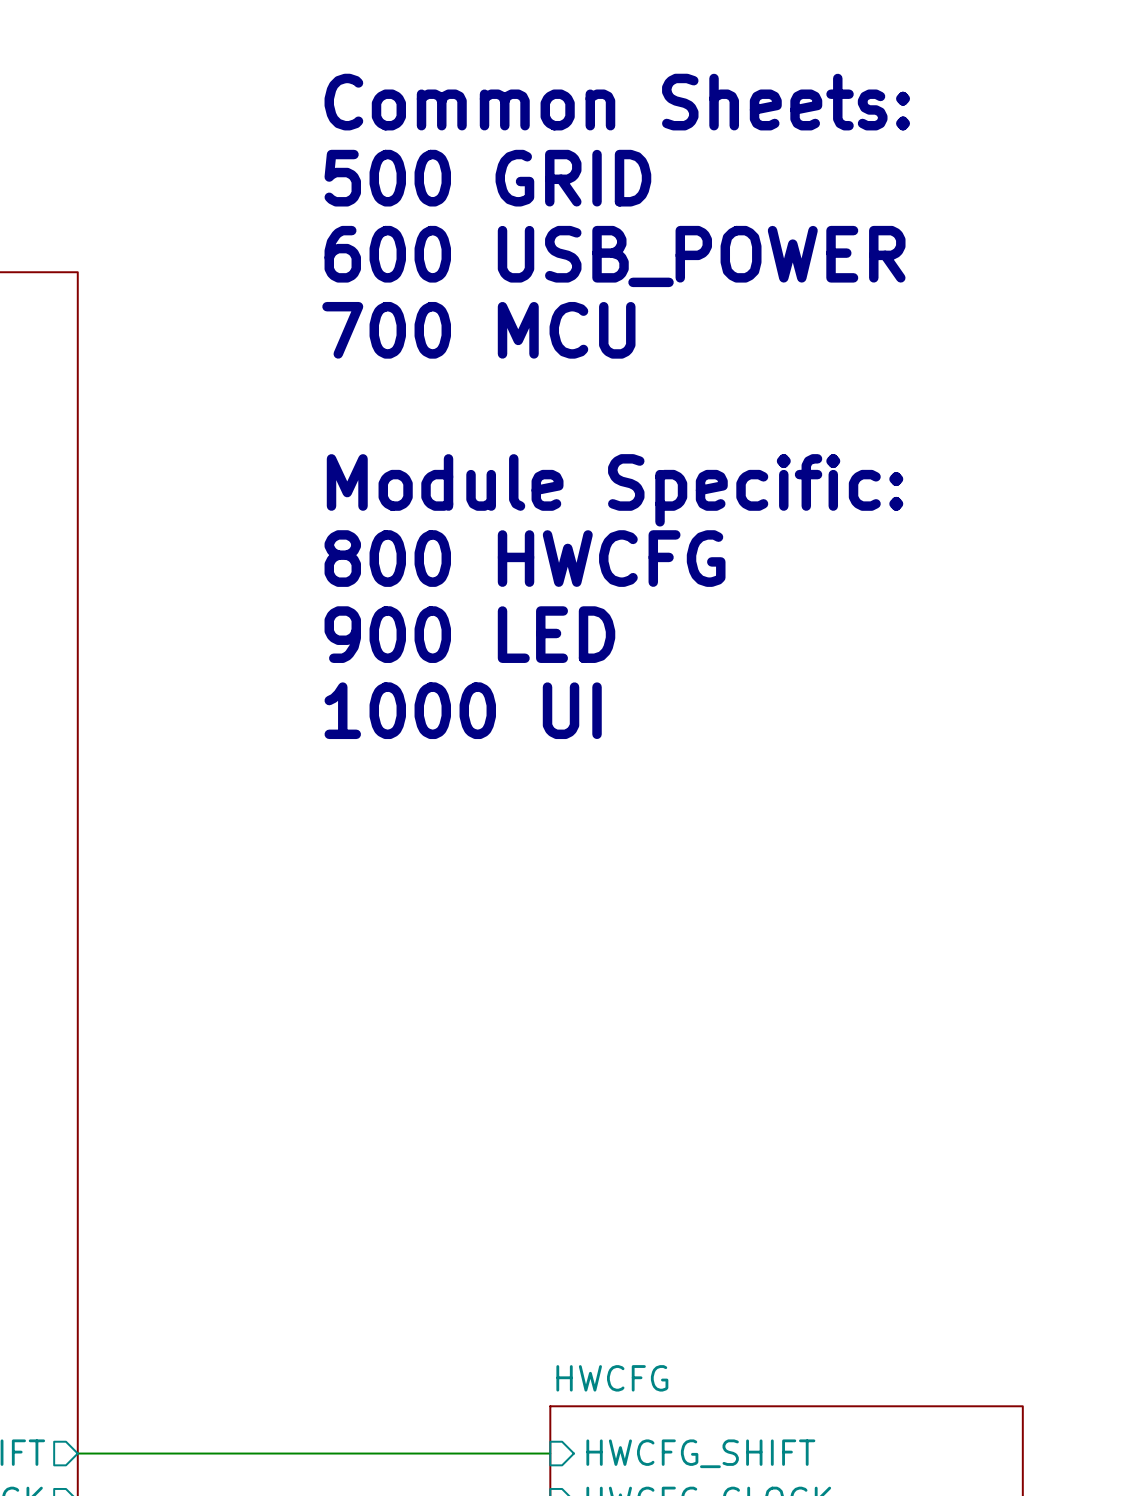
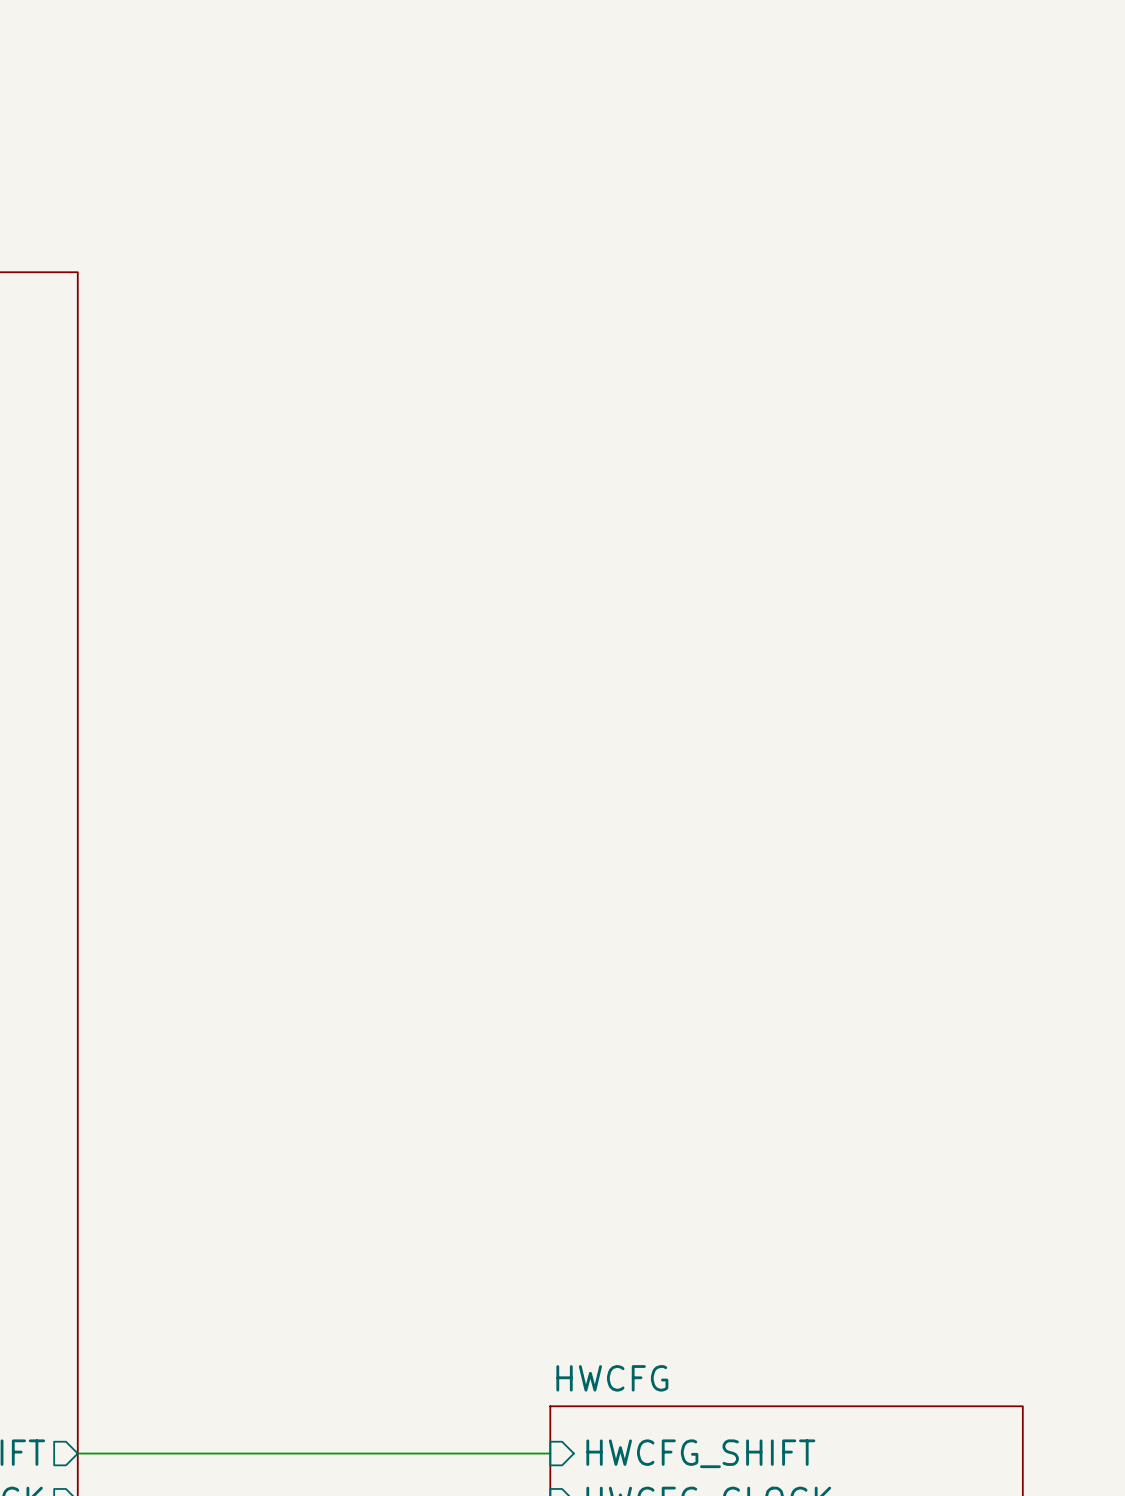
text: Common Sheets: (617, 102) -> none
text: 500 GRID (487, 178) -> none
text: 600 USB_POWER (615, 256) -> none
text: 700 MCU (478, 330) -> none
text: Module Specific: (615, 490) -> none
text: 800 HWCFG (525, 558) -> none
text: 900 LED (469, 634) -> none
text: 1000 UI (463, 710) -> none

